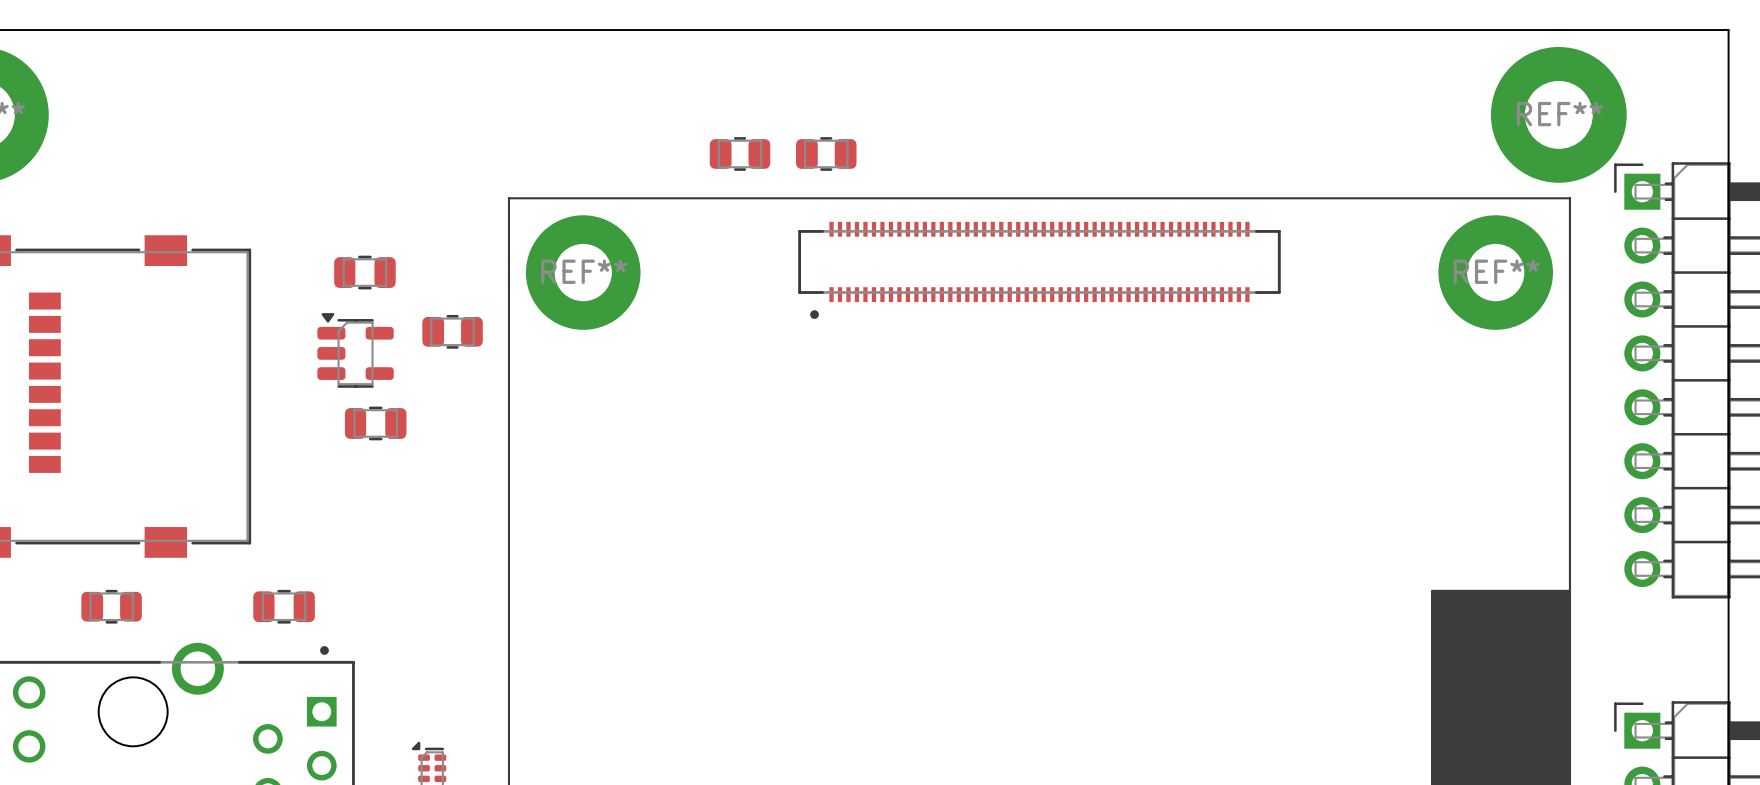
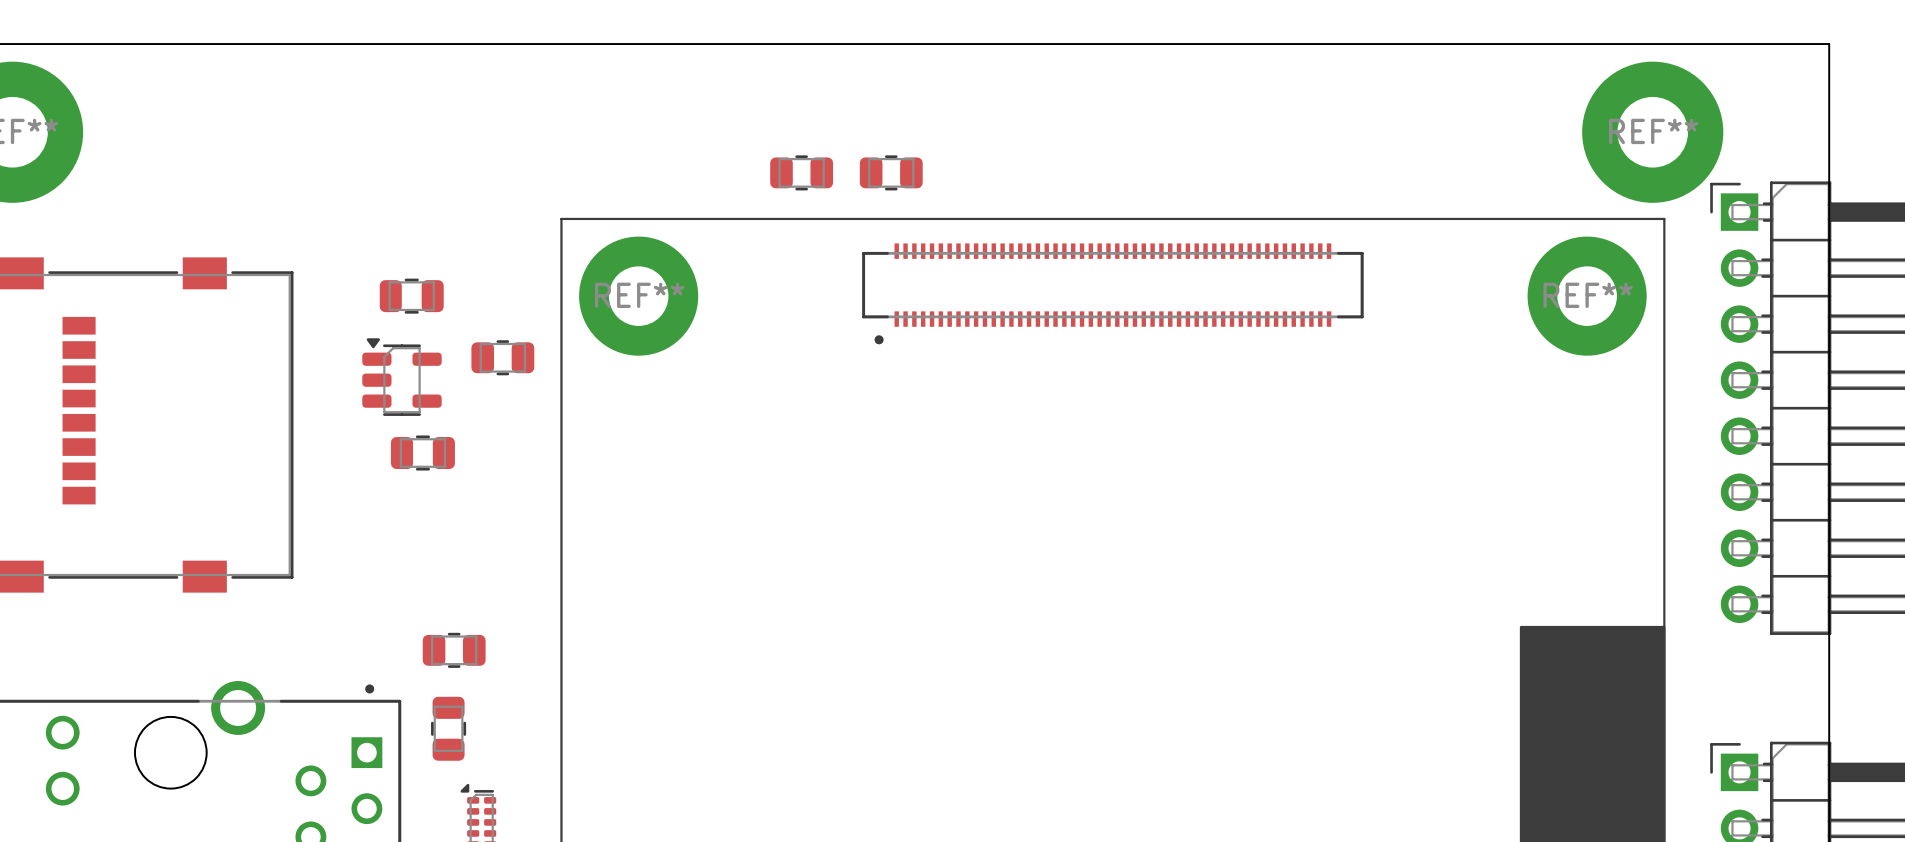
part position: (111, 606) -> (454, 650)
part rotation: 0° (284, 606) -> 90° clockwise (448, 728)
part position: (284, 606) -> (448, 728)

